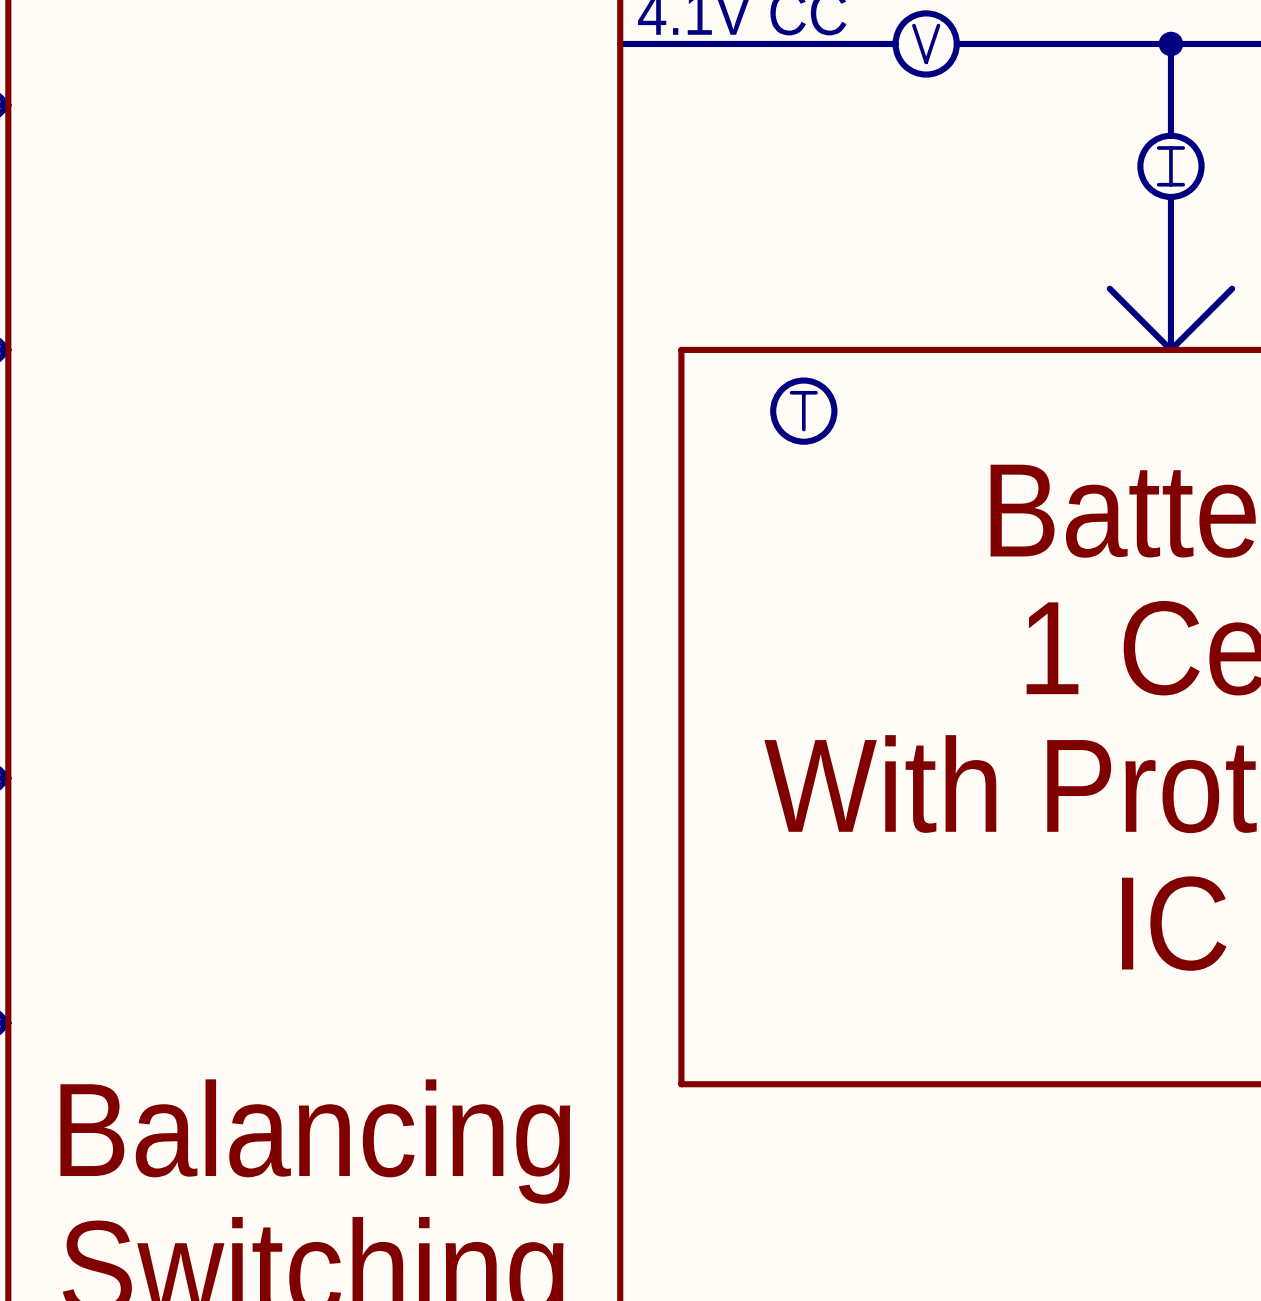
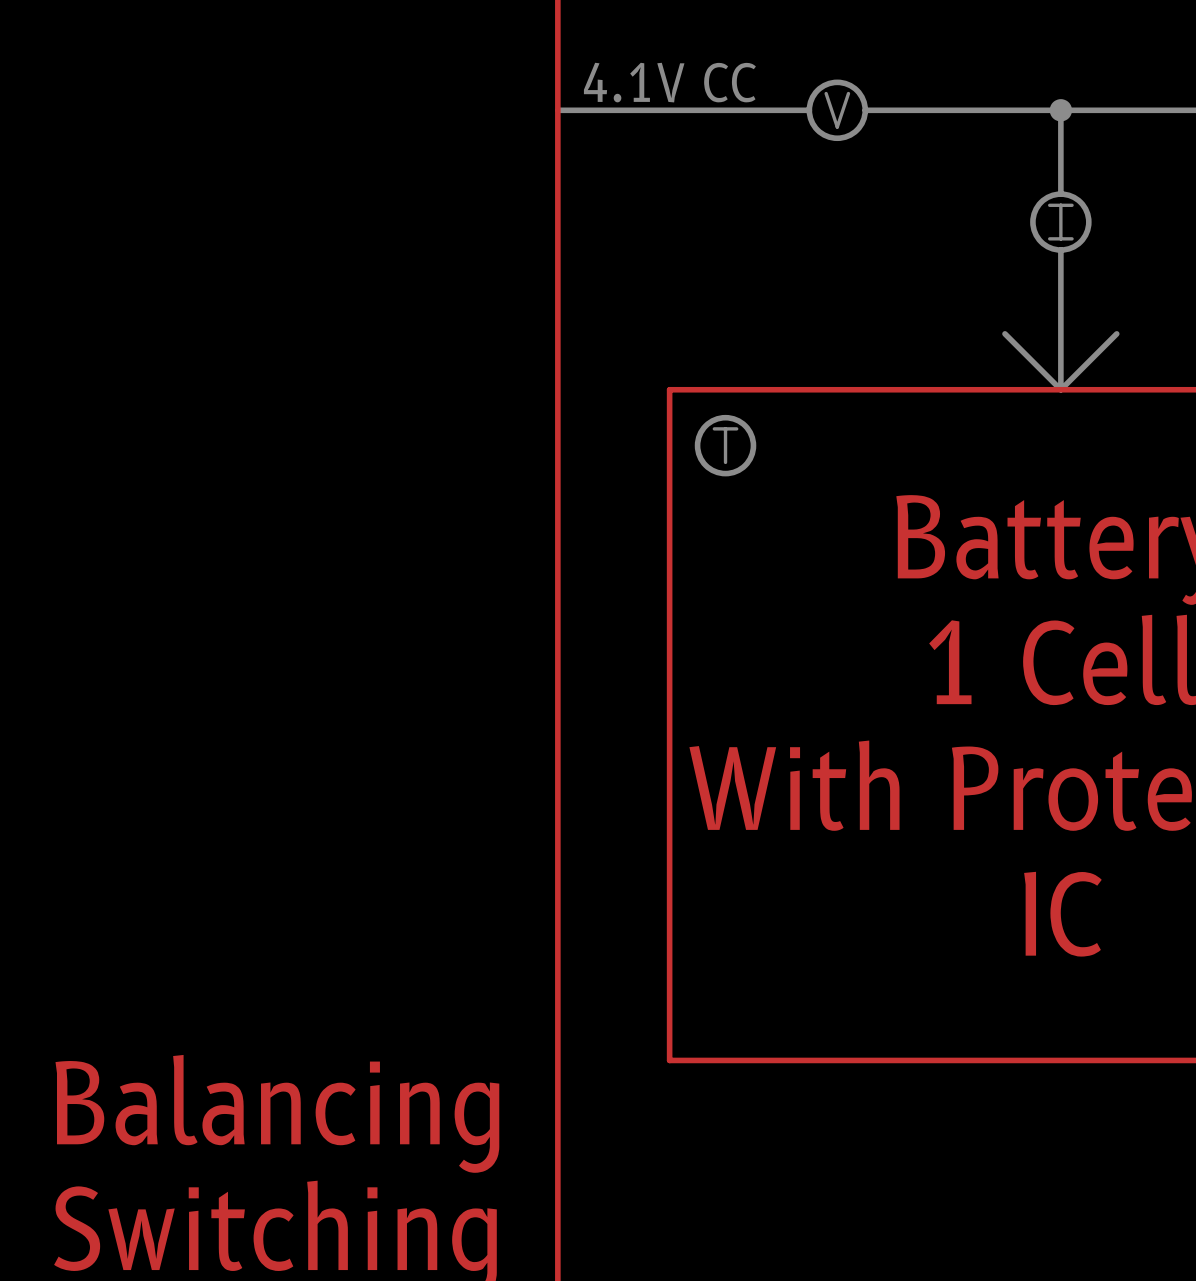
line: (742, 349) (681, 349) (681, 1084) (742, 1084) -> (669, 389) (669, 1060)

